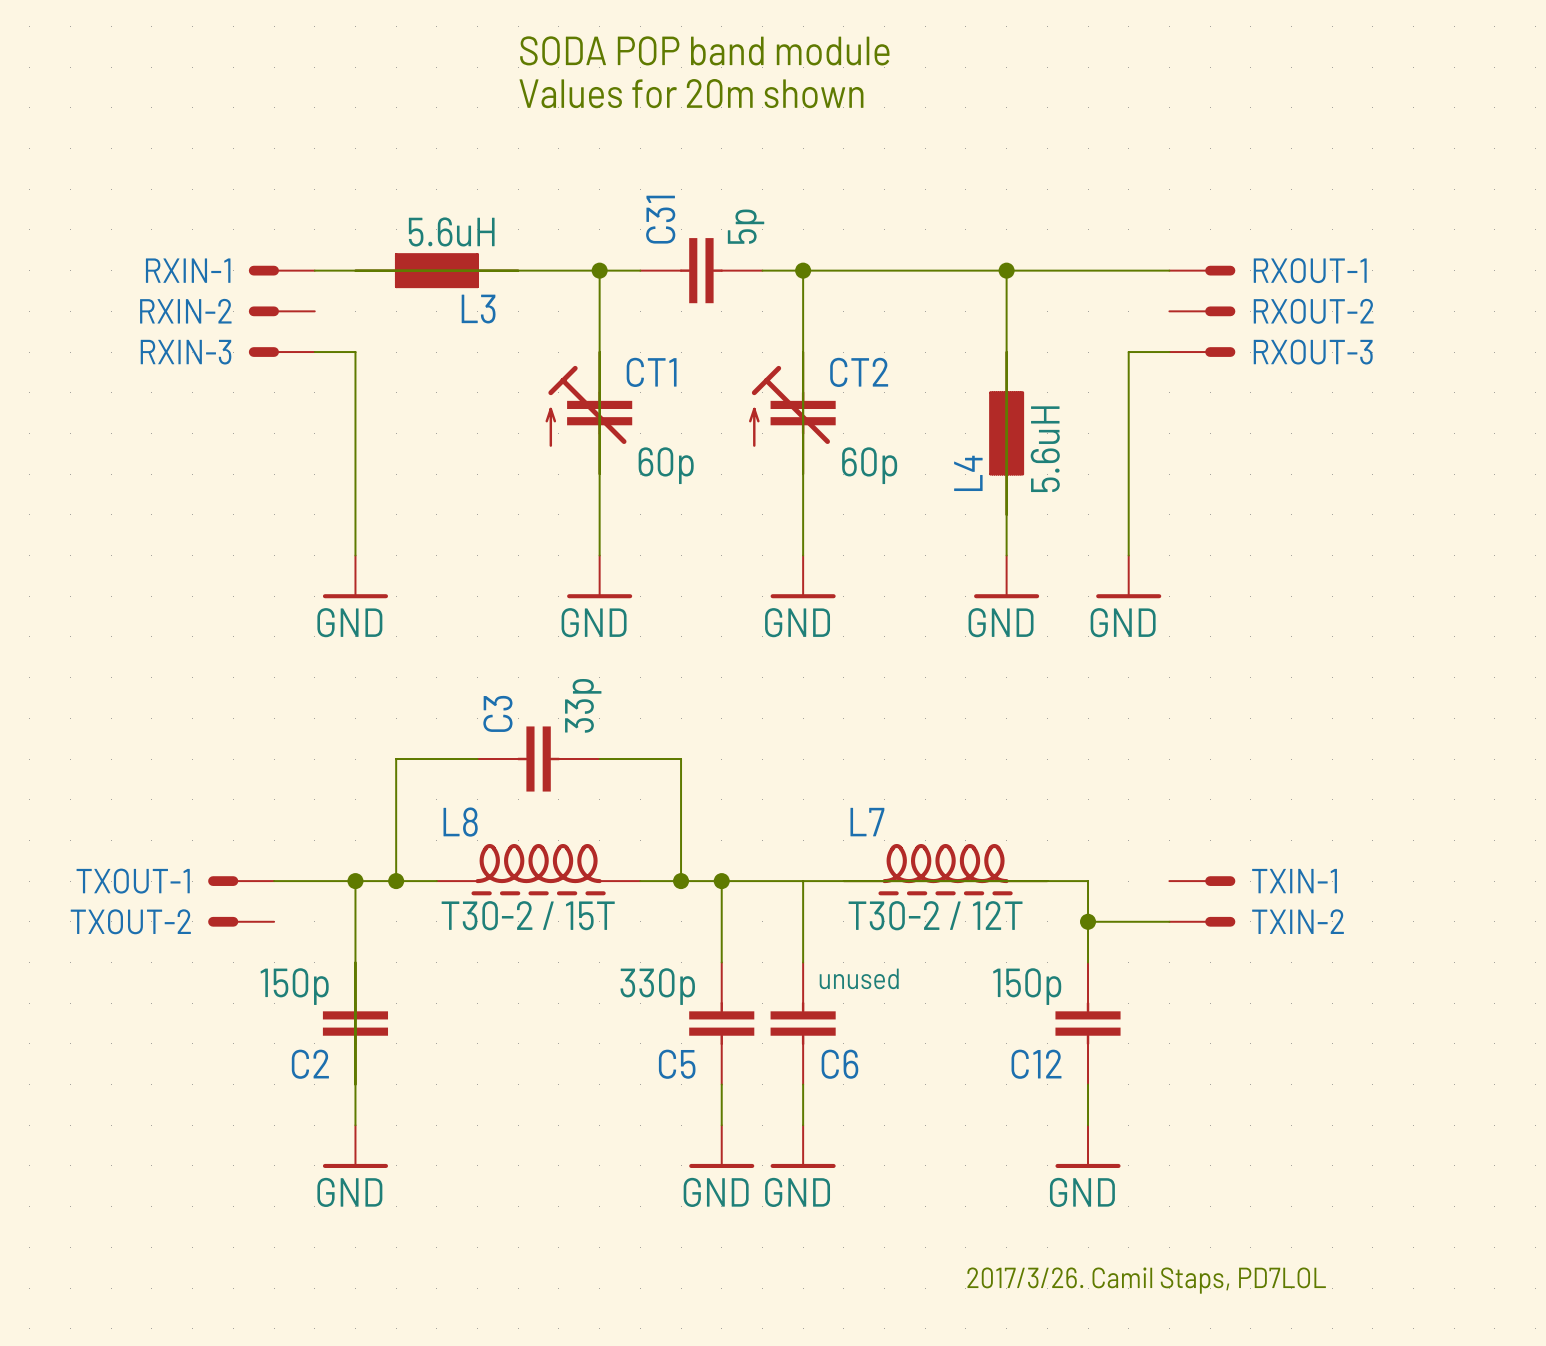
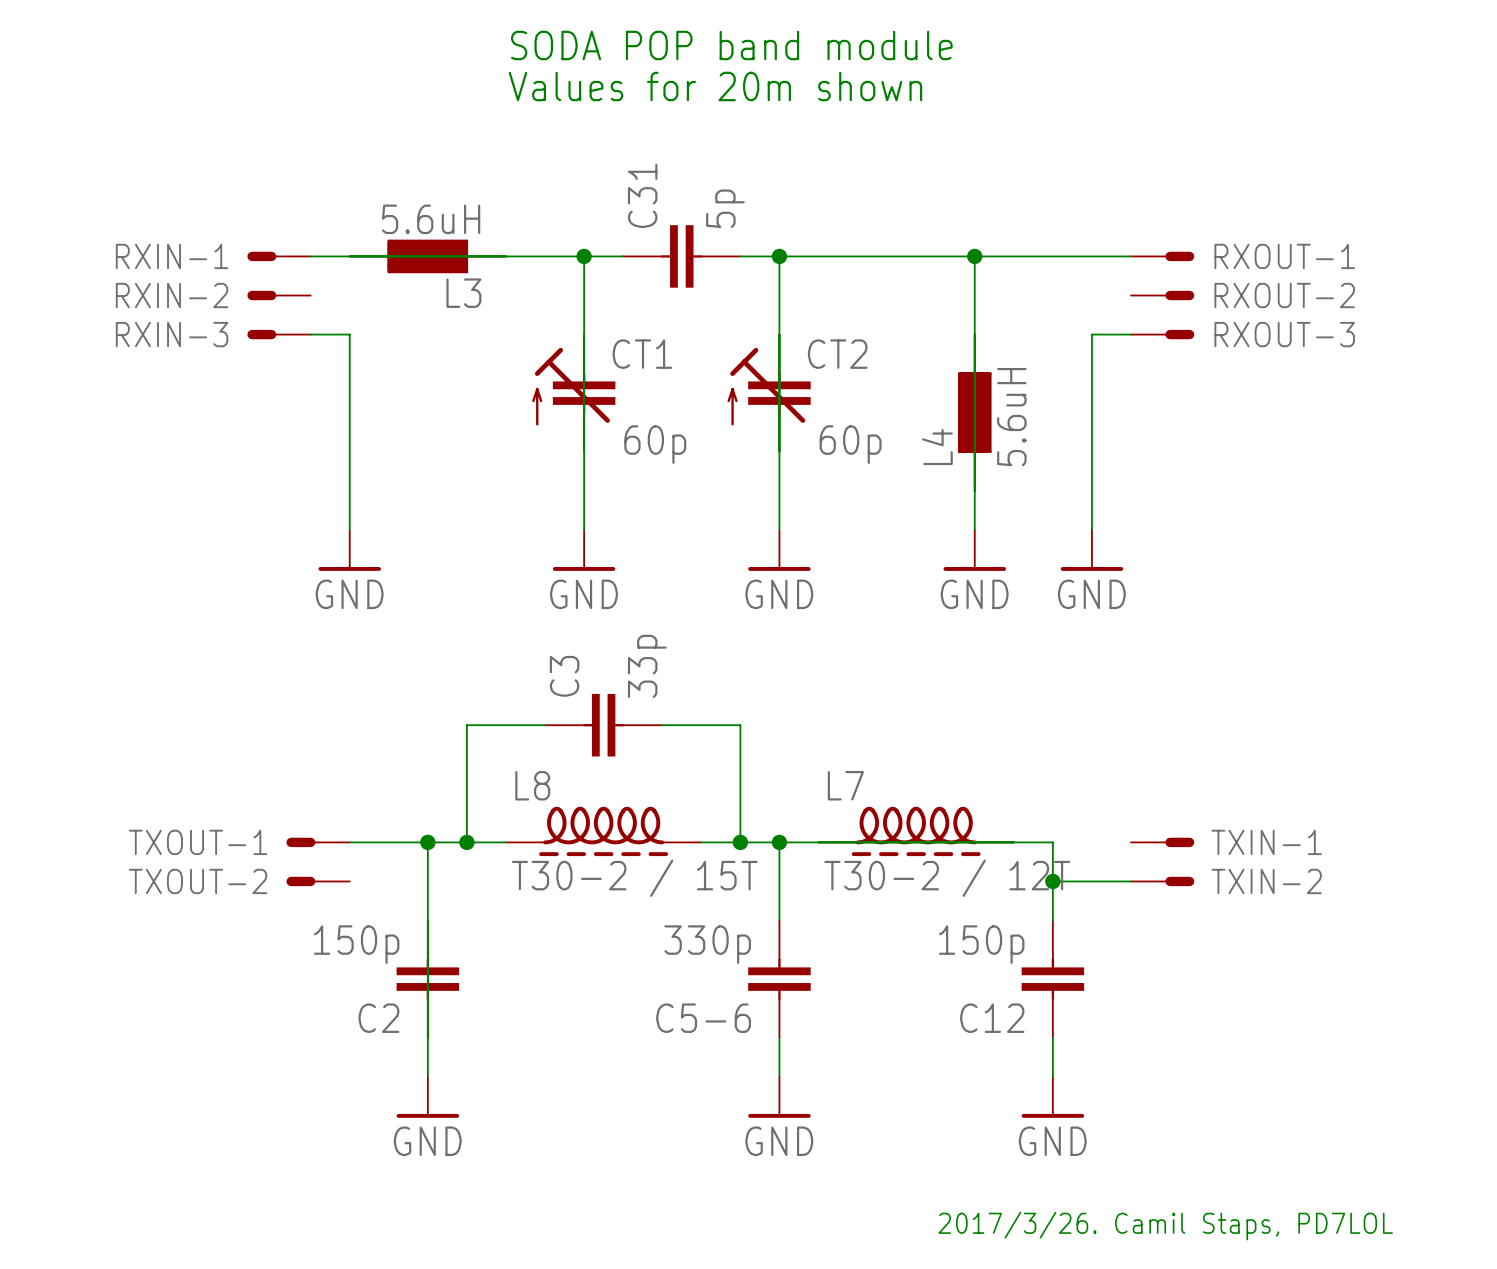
wire: (477, 759) (396, 759) (396, 881) -> (545, 725) (466, 725) (466, 842)
C3 position: (538, 759) -> (603, 725)
wire: (599, 759) (681, 759) (681, 881) -> (662, 725) (740, 725) (740, 842)
L8 position: (538, 869) -> (603, 831)
TXOUT-1 position: (241, 881) -> (318, 842)
wire: (274, 881) (355, 881) (355, 1125) -> none
junction: (355, 881) -> none
junction: (396, 881) -> none
junction: none -> (427, 842)
junction: none -> (466, 842)
wire: none -> (505, 842) (427, 842) (427, 1076)
wire: (640, 881) (721, 881) (721, 962) -> none
junction: (681, 881) -> none
junction: (721, 881) -> none
junction: none -> (740, 842)
junction: none -> (779, 842)
TXOUT-2 position: (241, 921) -> (318, 881)
C6 value: unused (859, 978) -> 330p (707, 944)
C2 position: (355, 1023) -> (427, 979)
C5: 330p (721, 1023) -> none
C6 name: C6 (839, 1064) -> C5-6 (703, 1018)
wire: (721, 1084) (721, 1125) -> none
power symbol position: GND (355, 1146) -> GND (427, 1097)
power symbol: GND (721, 1146) -> none

